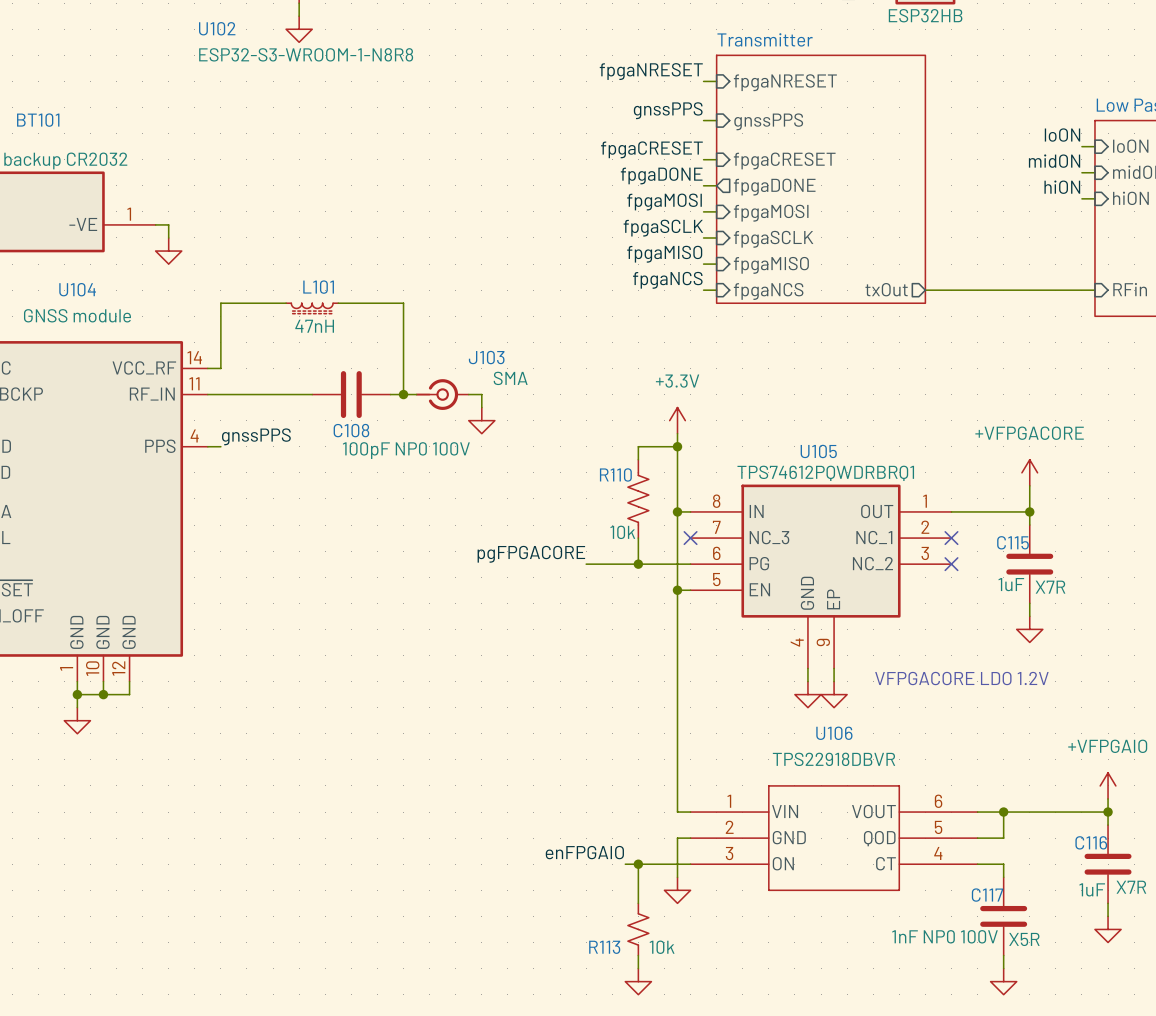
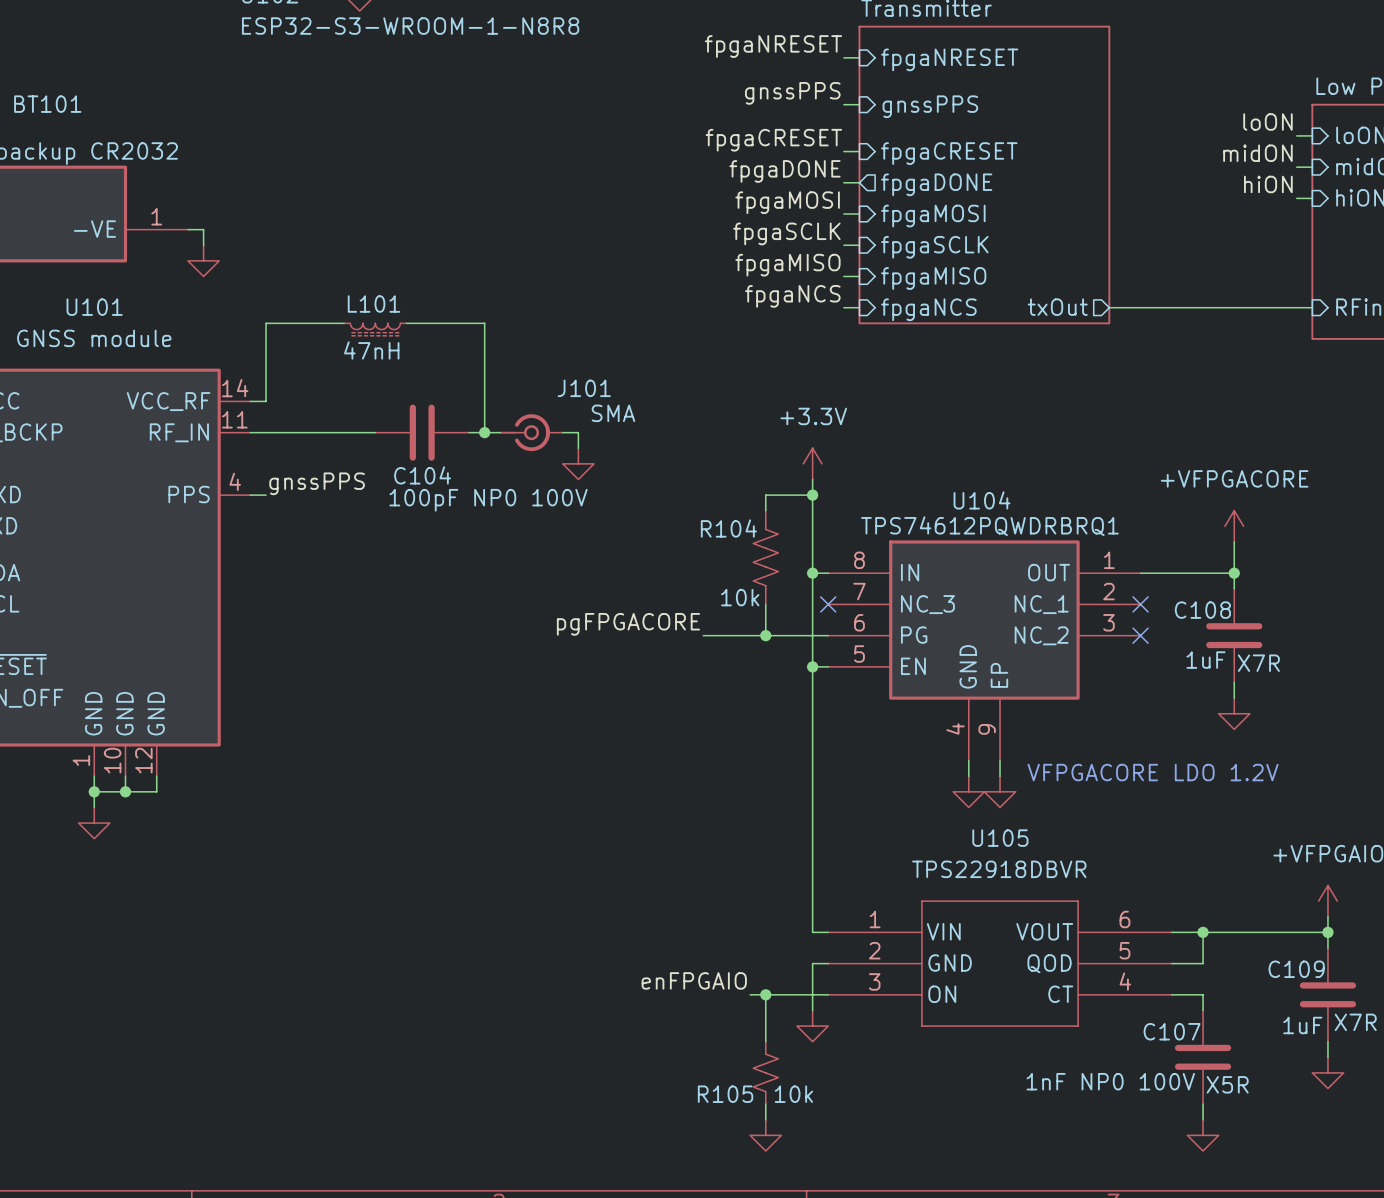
U104 name: U104 (77, 289) -> U101 (94, 307)
J103 name: J103 (486, 357) -> J101 (584, 388)
C108 name: C108 (351, 430) -> C104 (422, 475)
U105 name: U105 (818, 451) -> U104 (982, 500)
R110 name: R110 (615, 474) -> R104 (728, 528)
C115 name: C115 (1012, 542) -> C108 (1202, 610)
U106 name: U106 (834, 733) -> U105 (1000, 838)
C116 name: C116 (1091, 842) -> C109 (1296, 969)
C117 name: C117 (987, 895) -> C107 (1172, 1031)
R113 name: R113 (604, 947) -> R105 (725, 1094)

